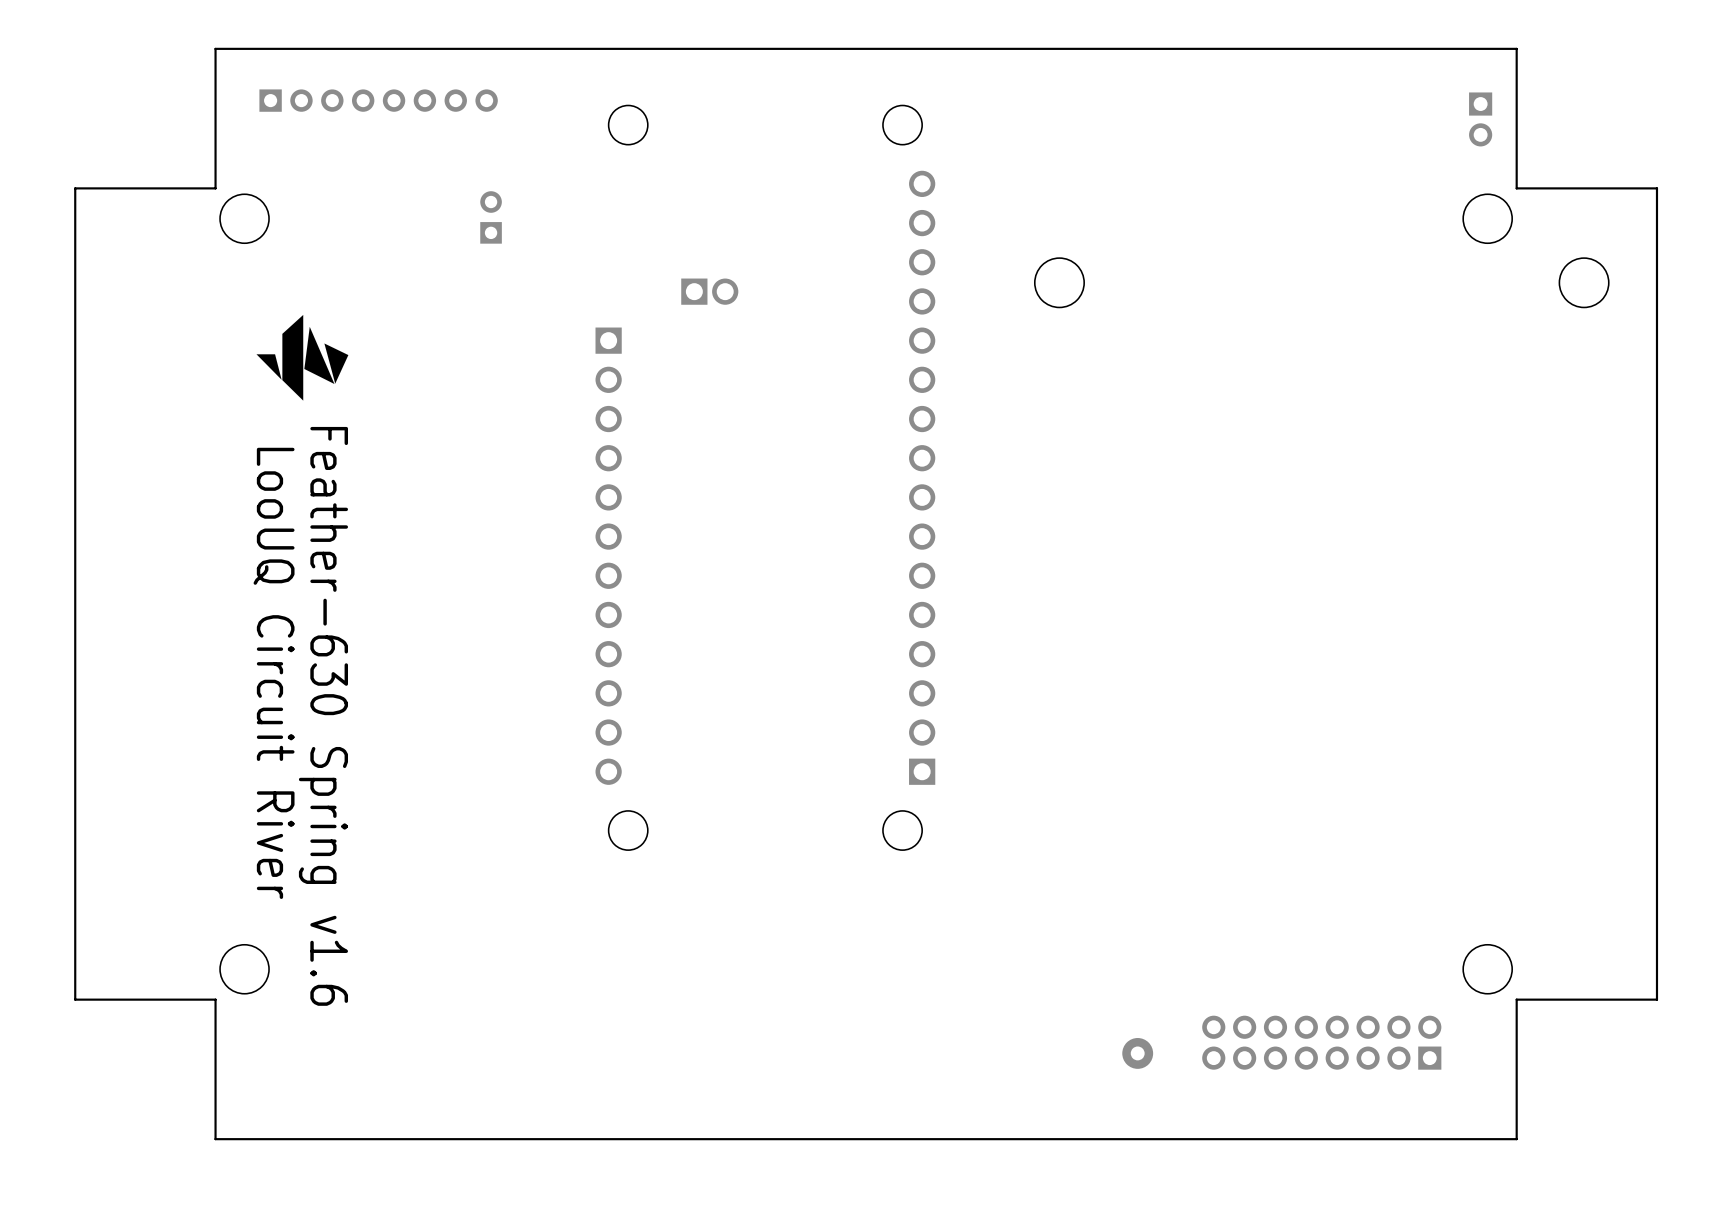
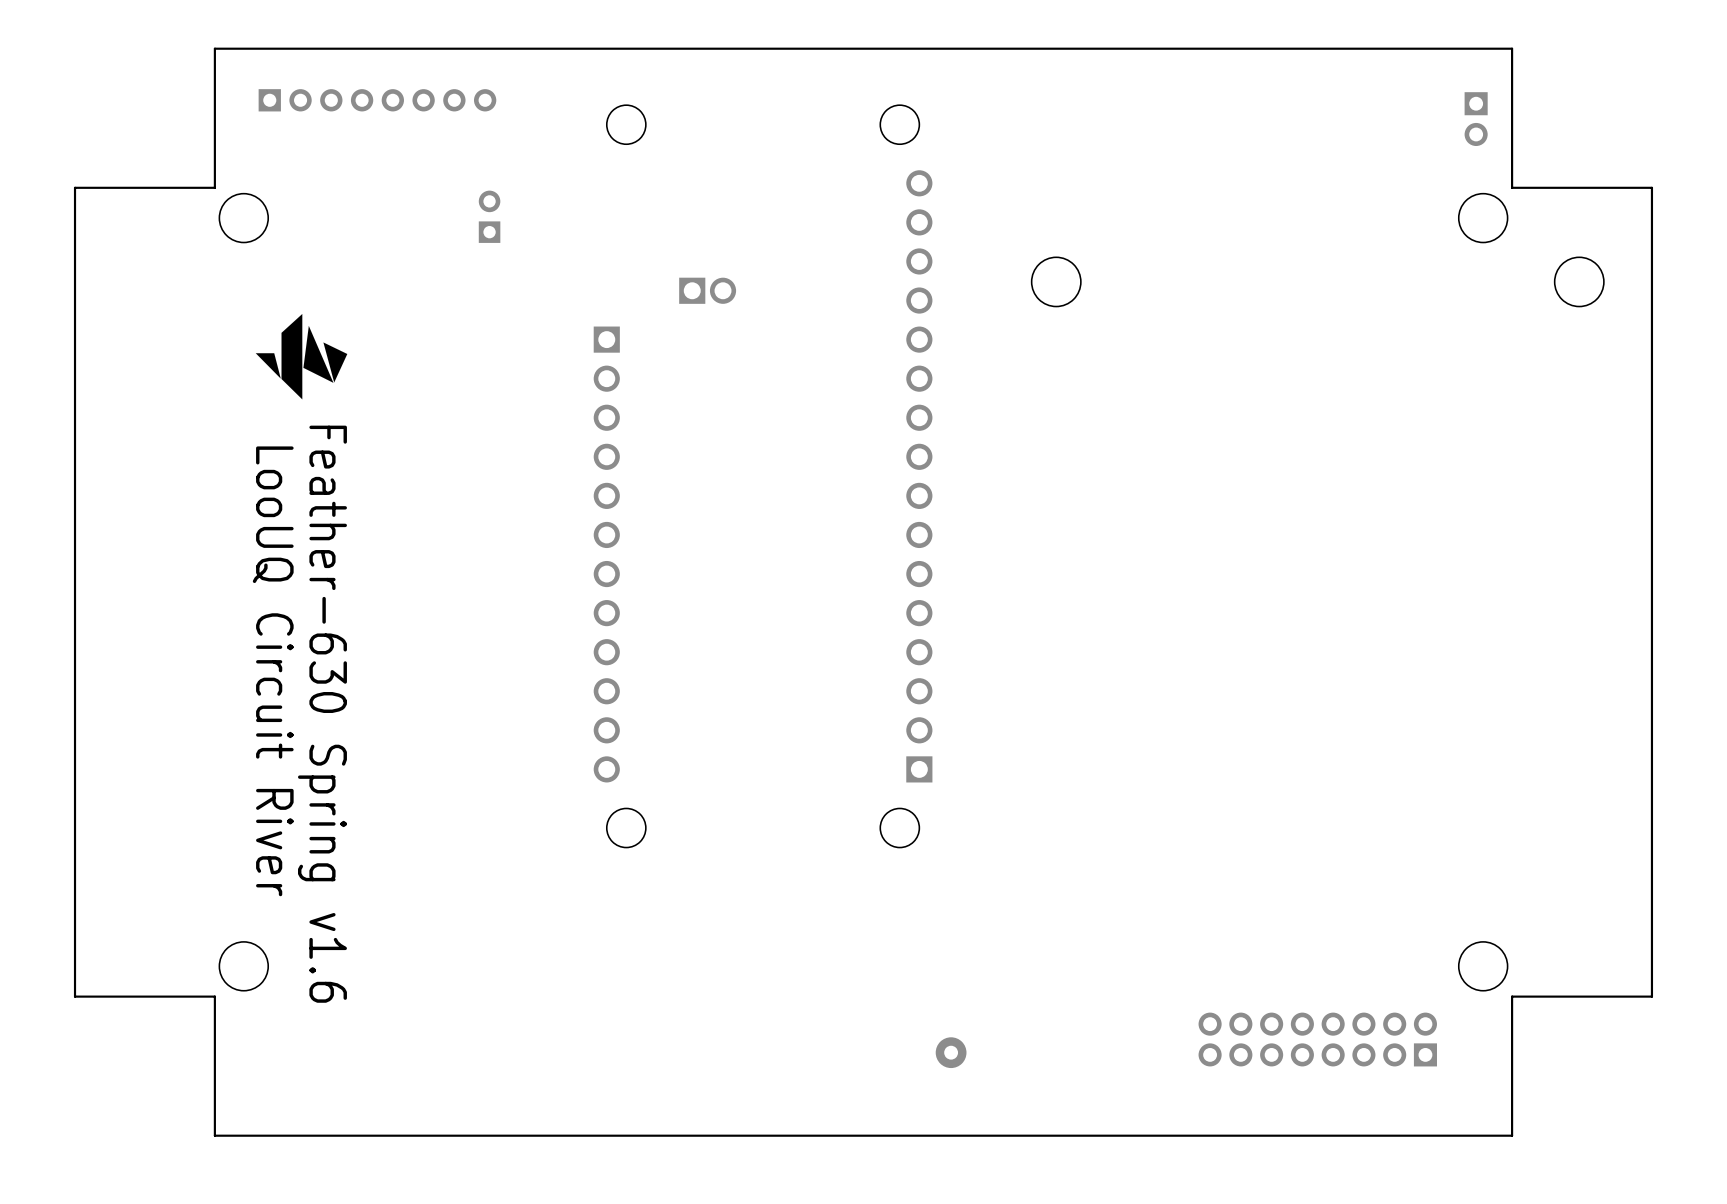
part position: (1137, 1053) -> (951, 1052)

